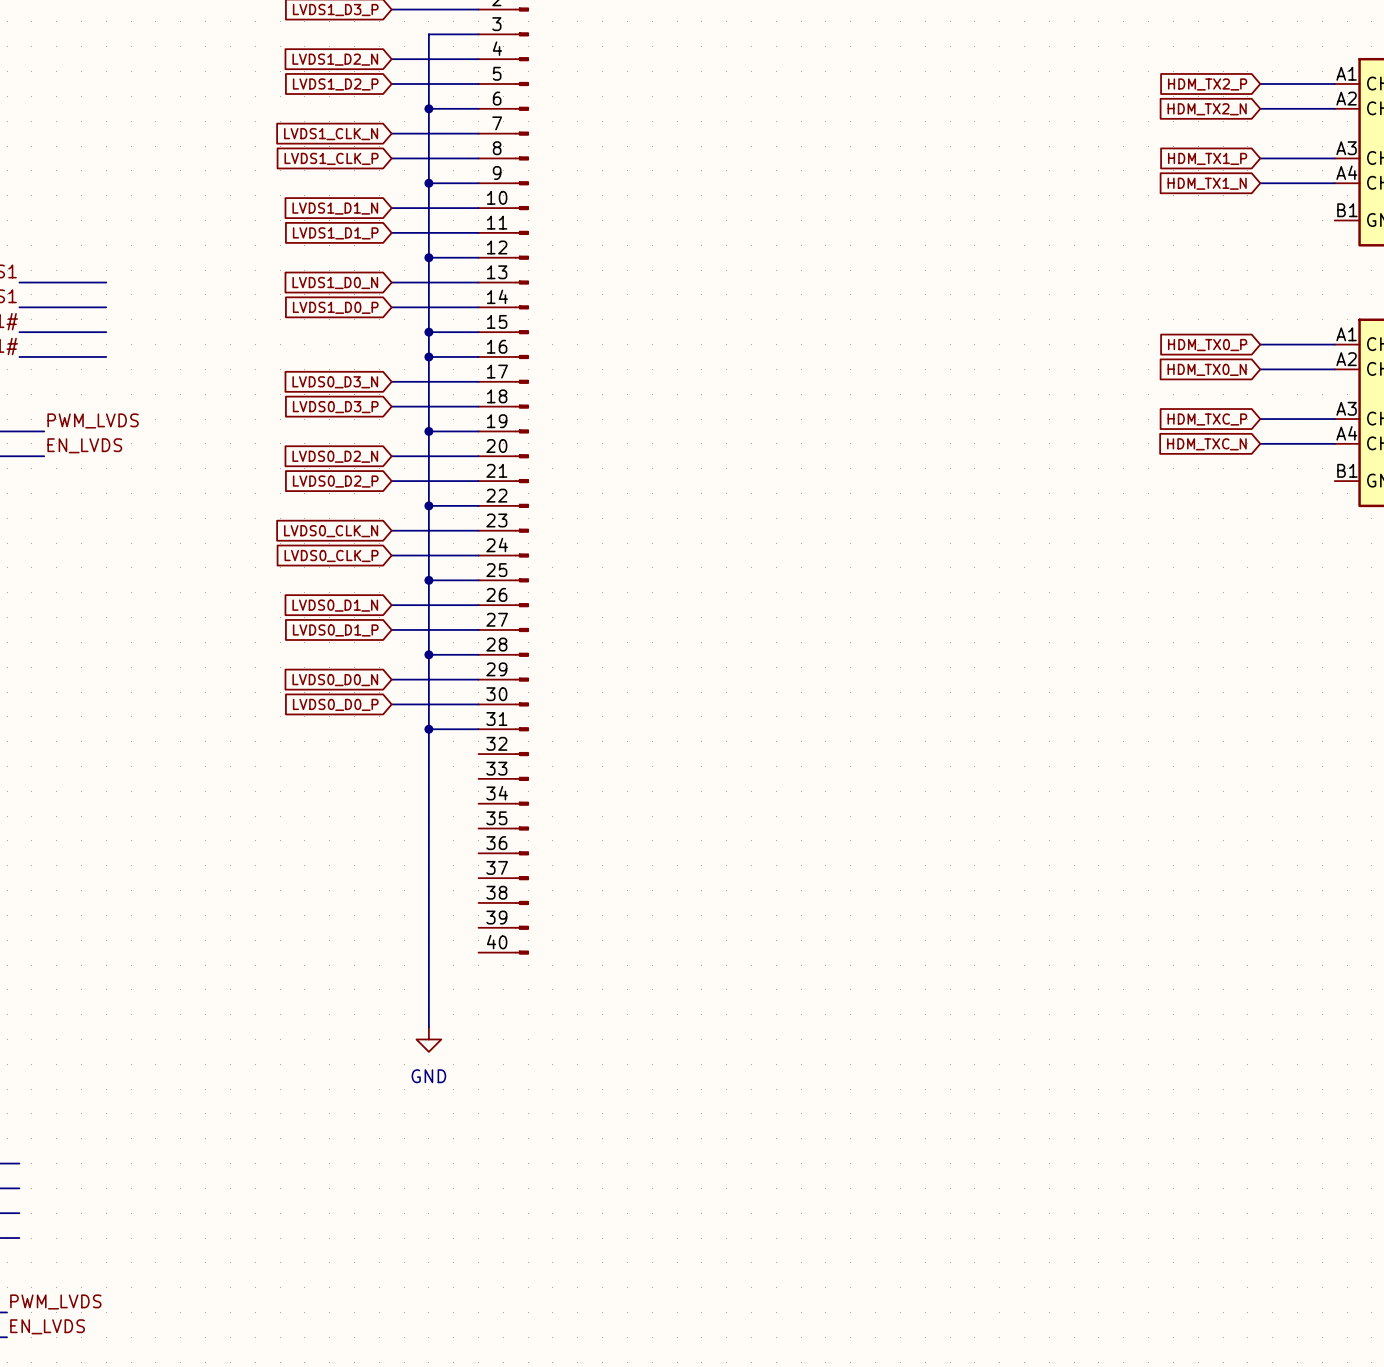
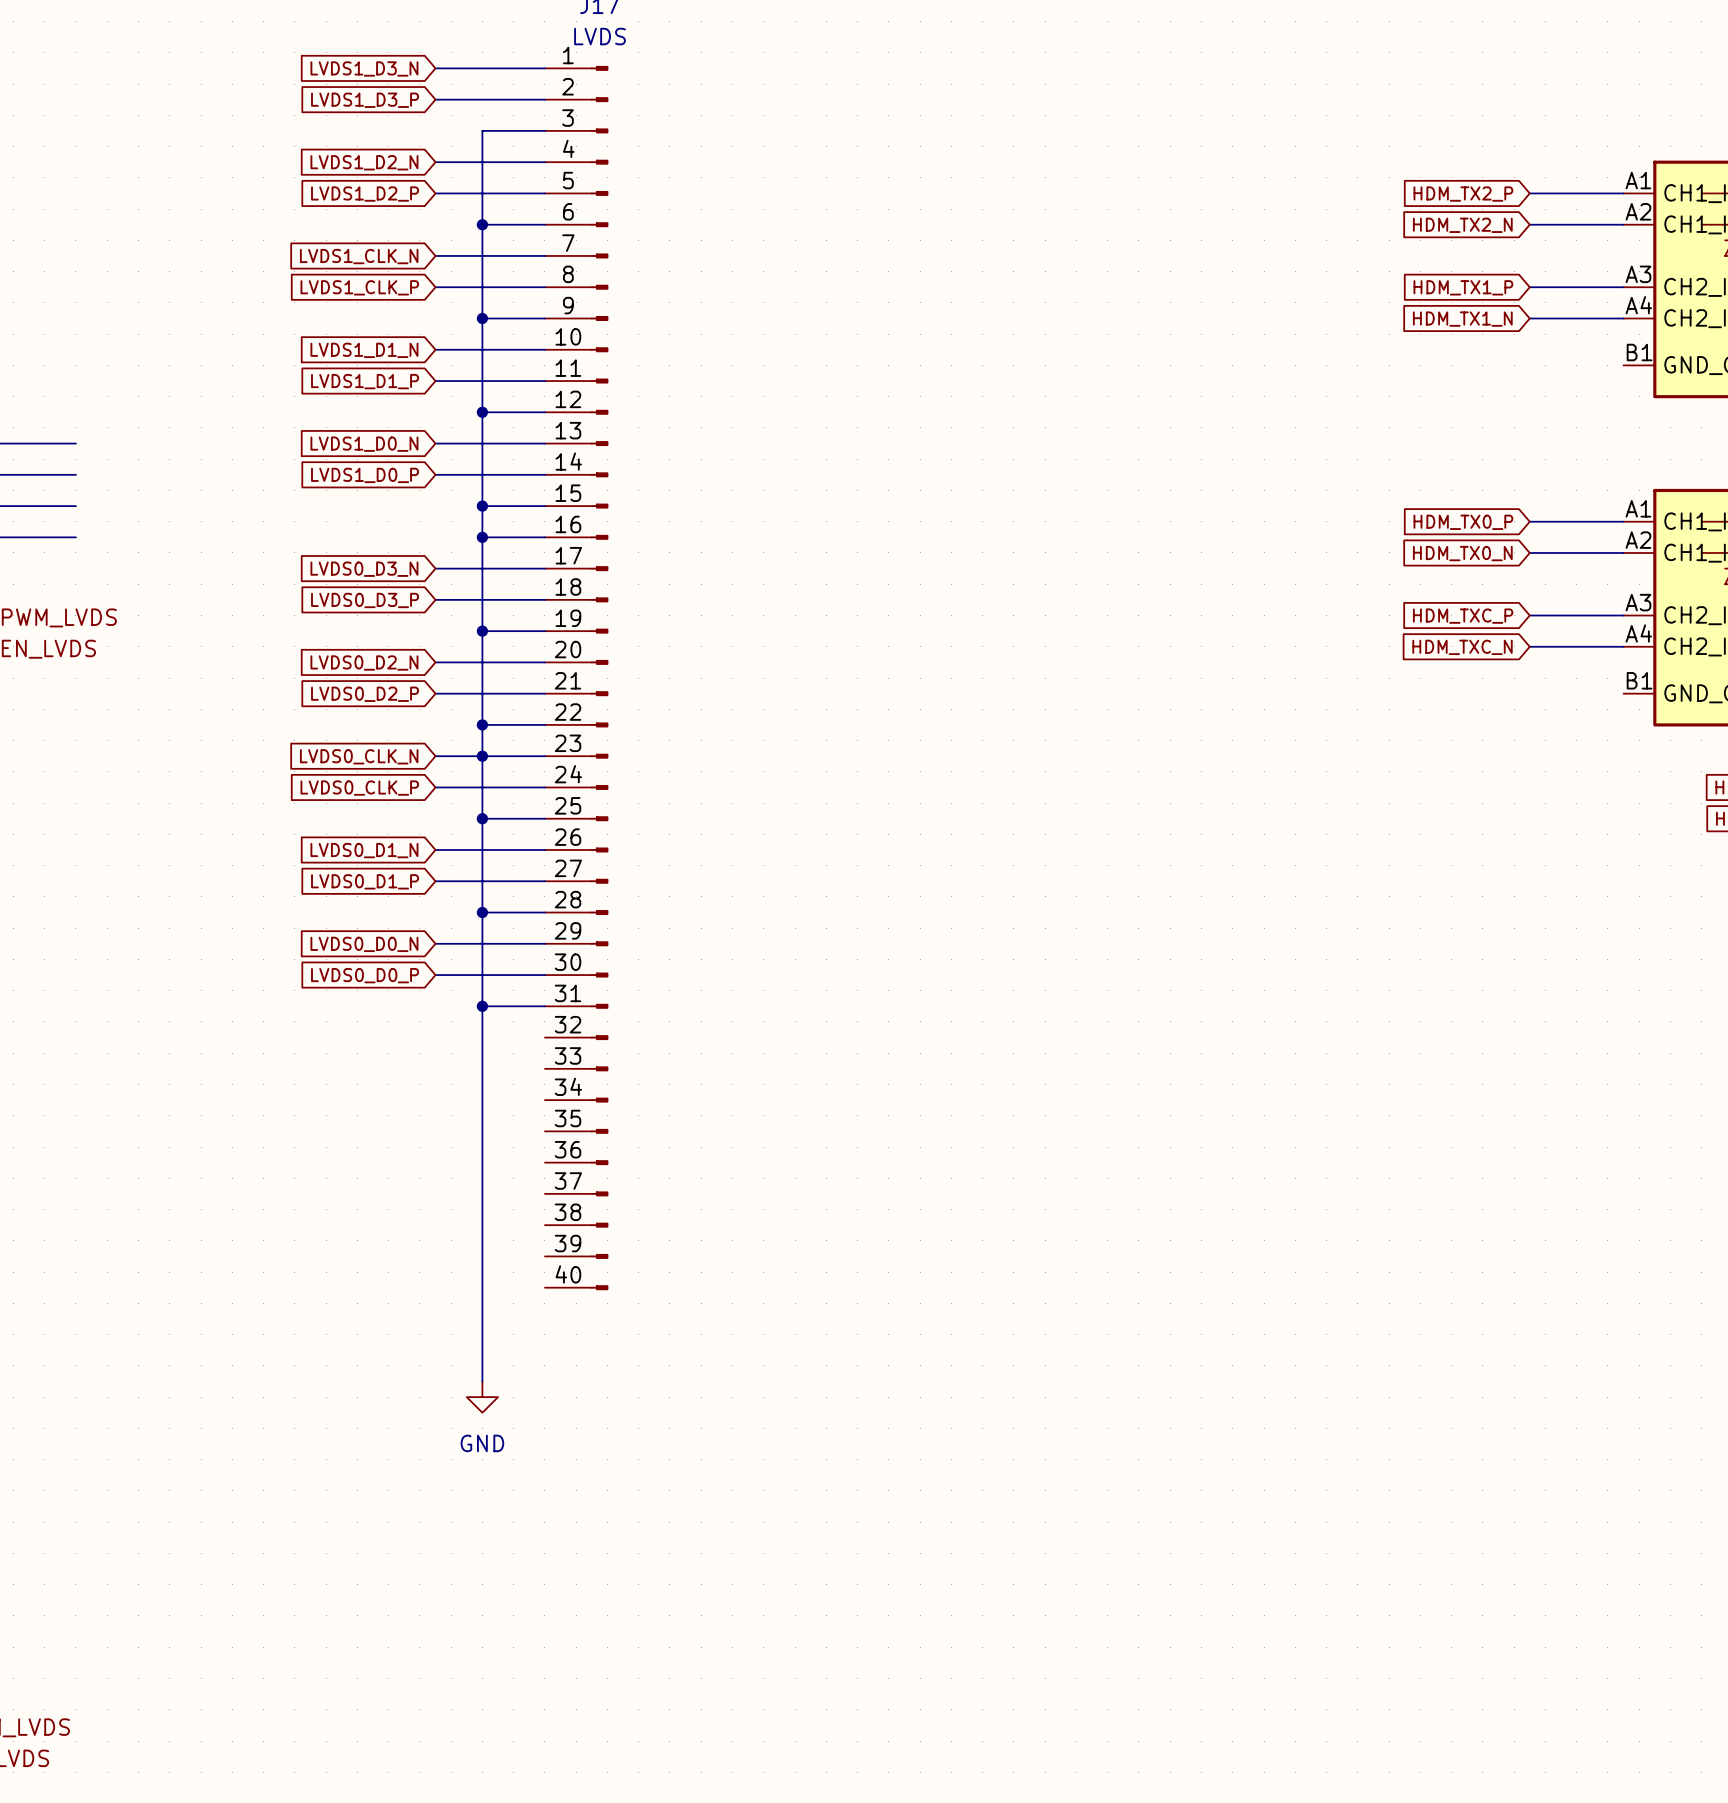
junction: none -> (482, 756)

